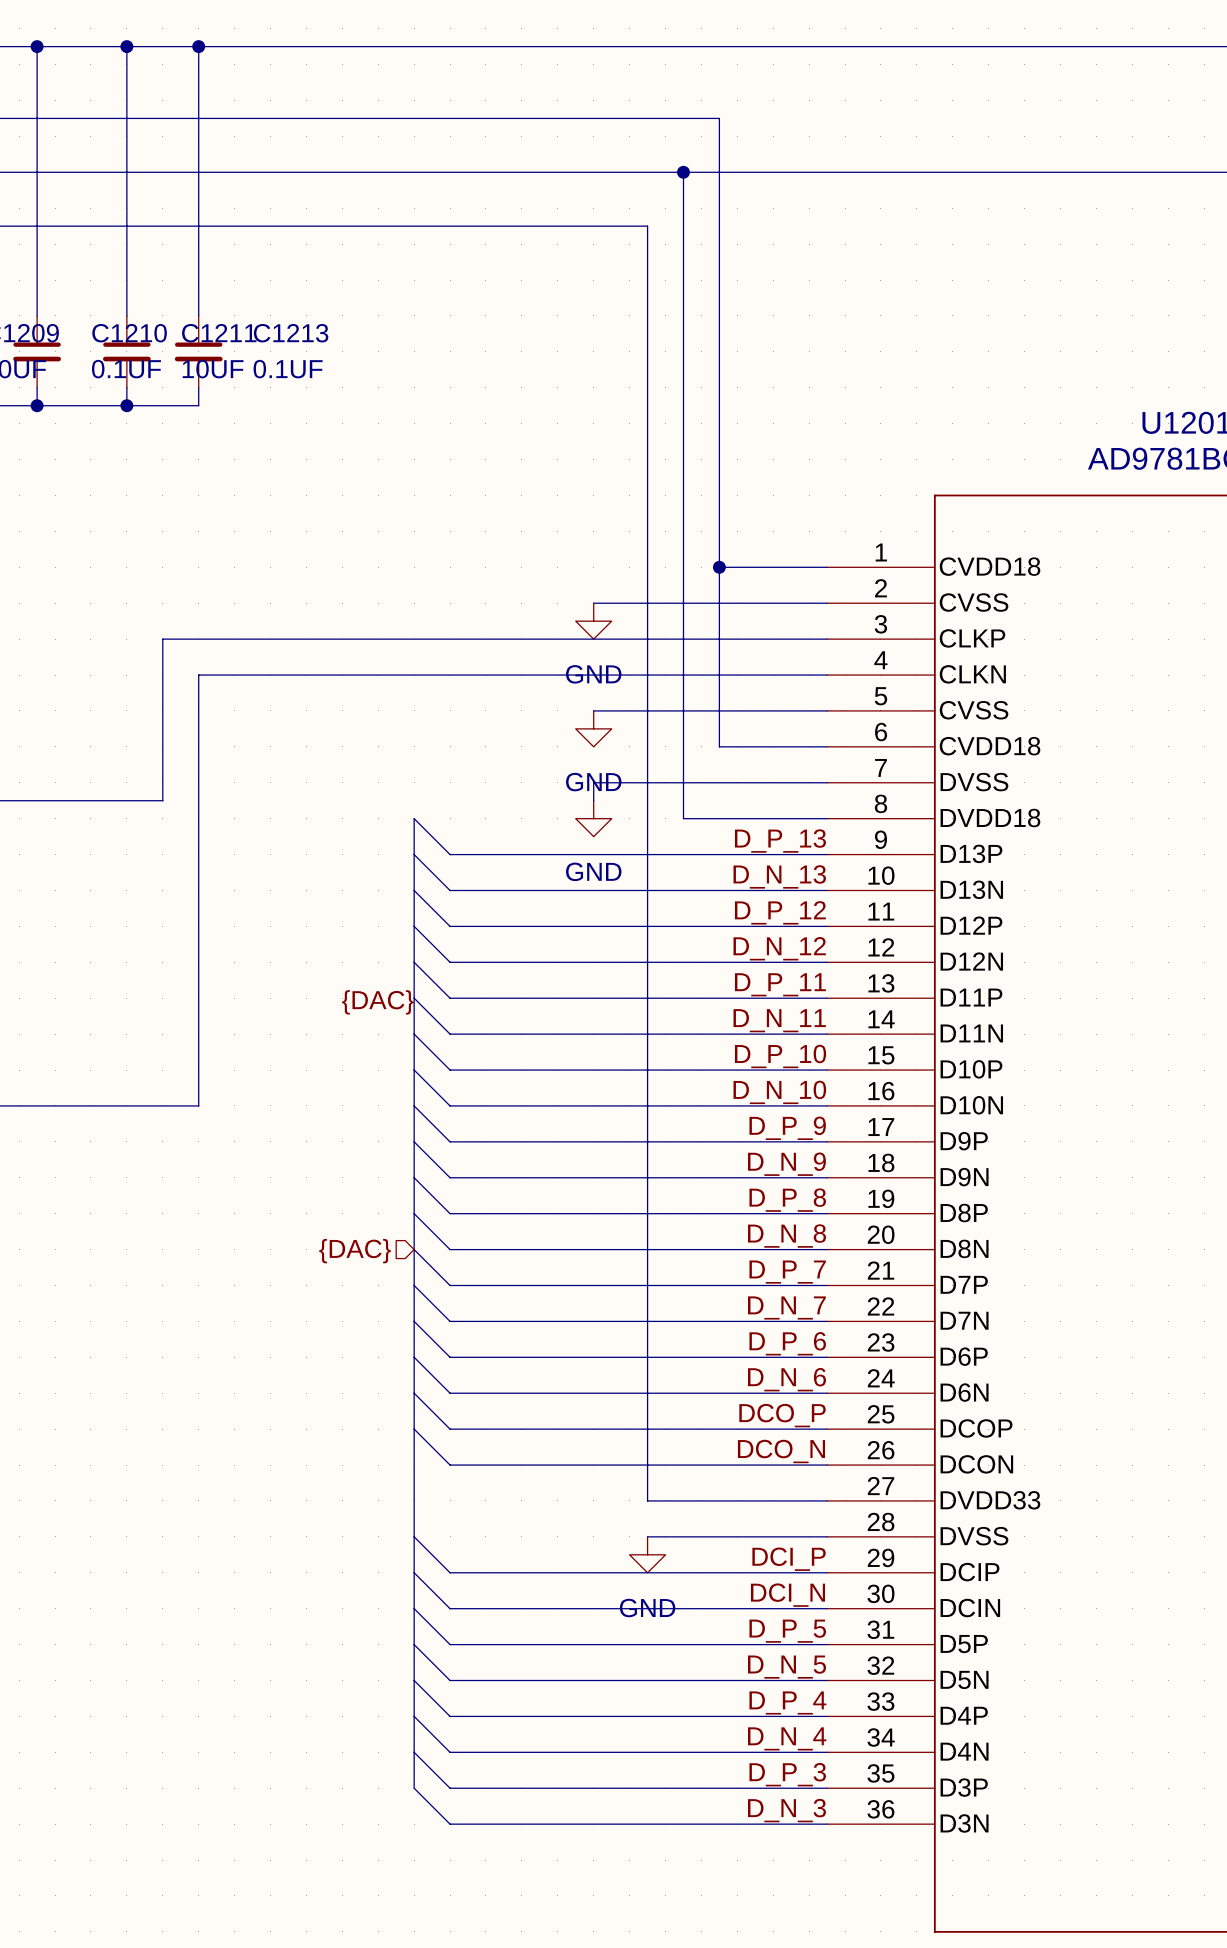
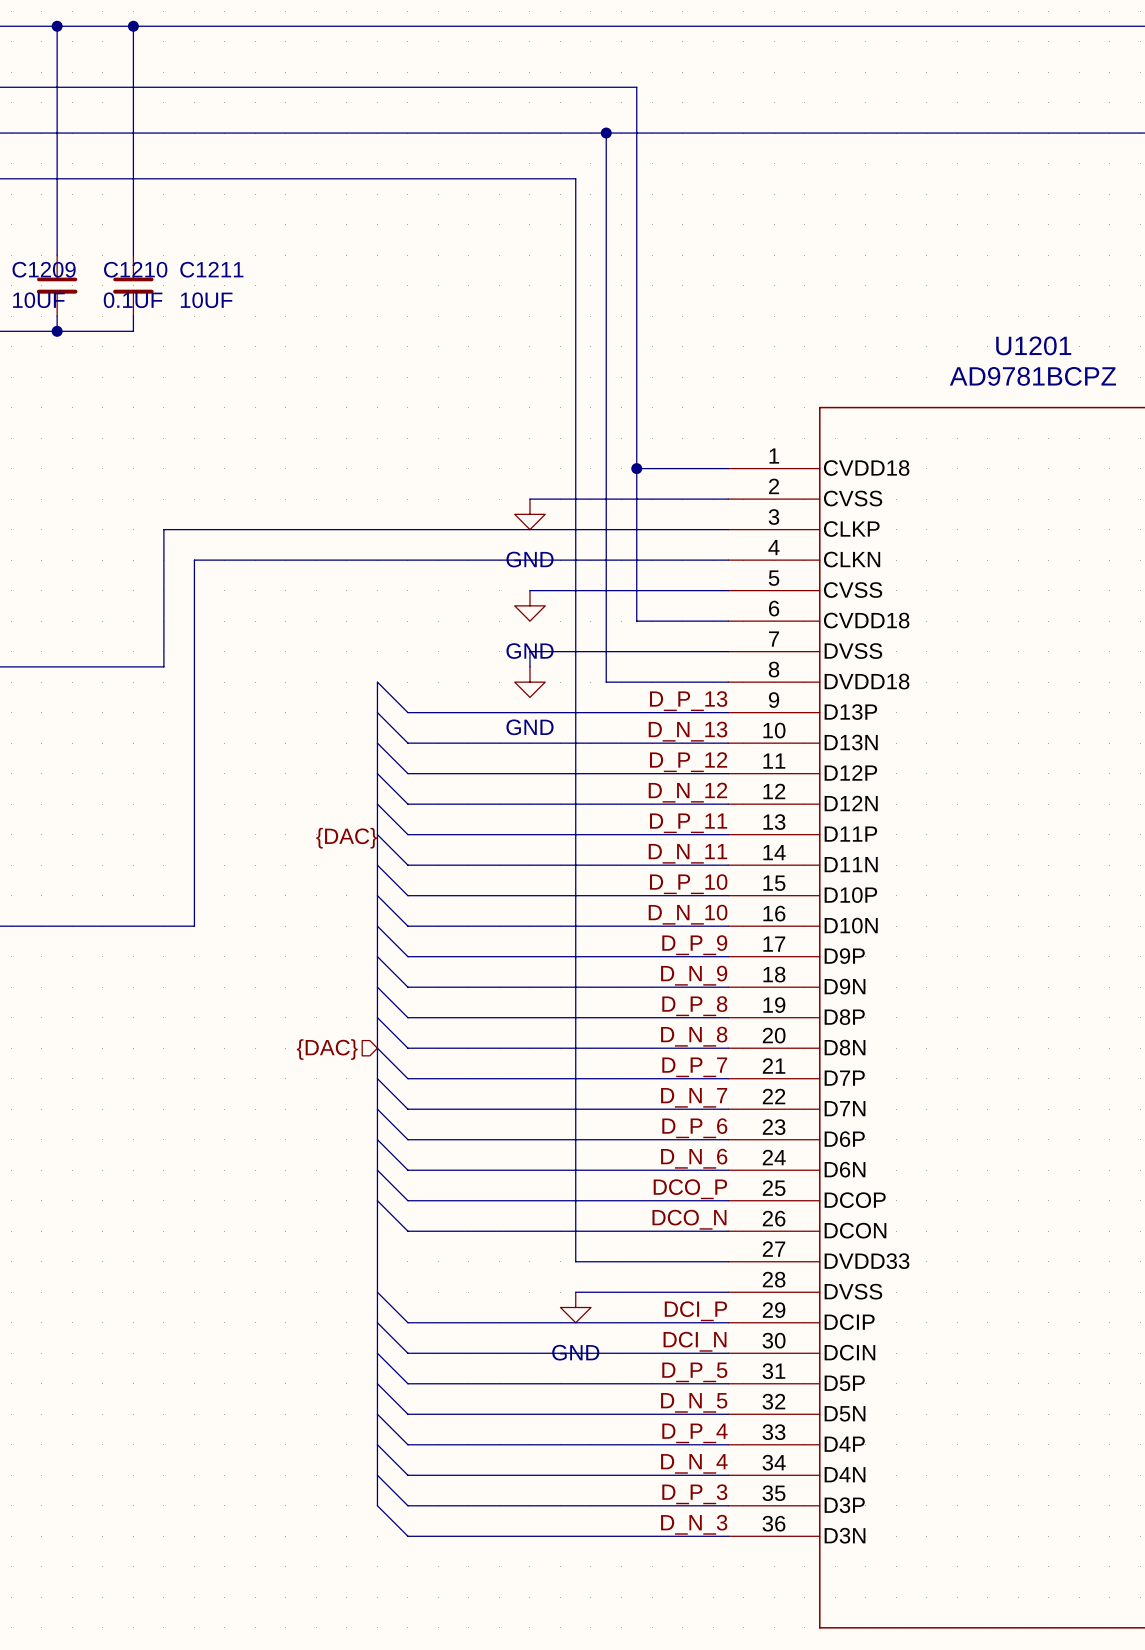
wire: (198, 46) (198, 315) -> none
junction: (198, 46) -> none
C1213: 0.1UF (198, 351) -> none
wire: (198, 387) (198, 405) (126, 405) -> none
junction: (126, 405) -> none

